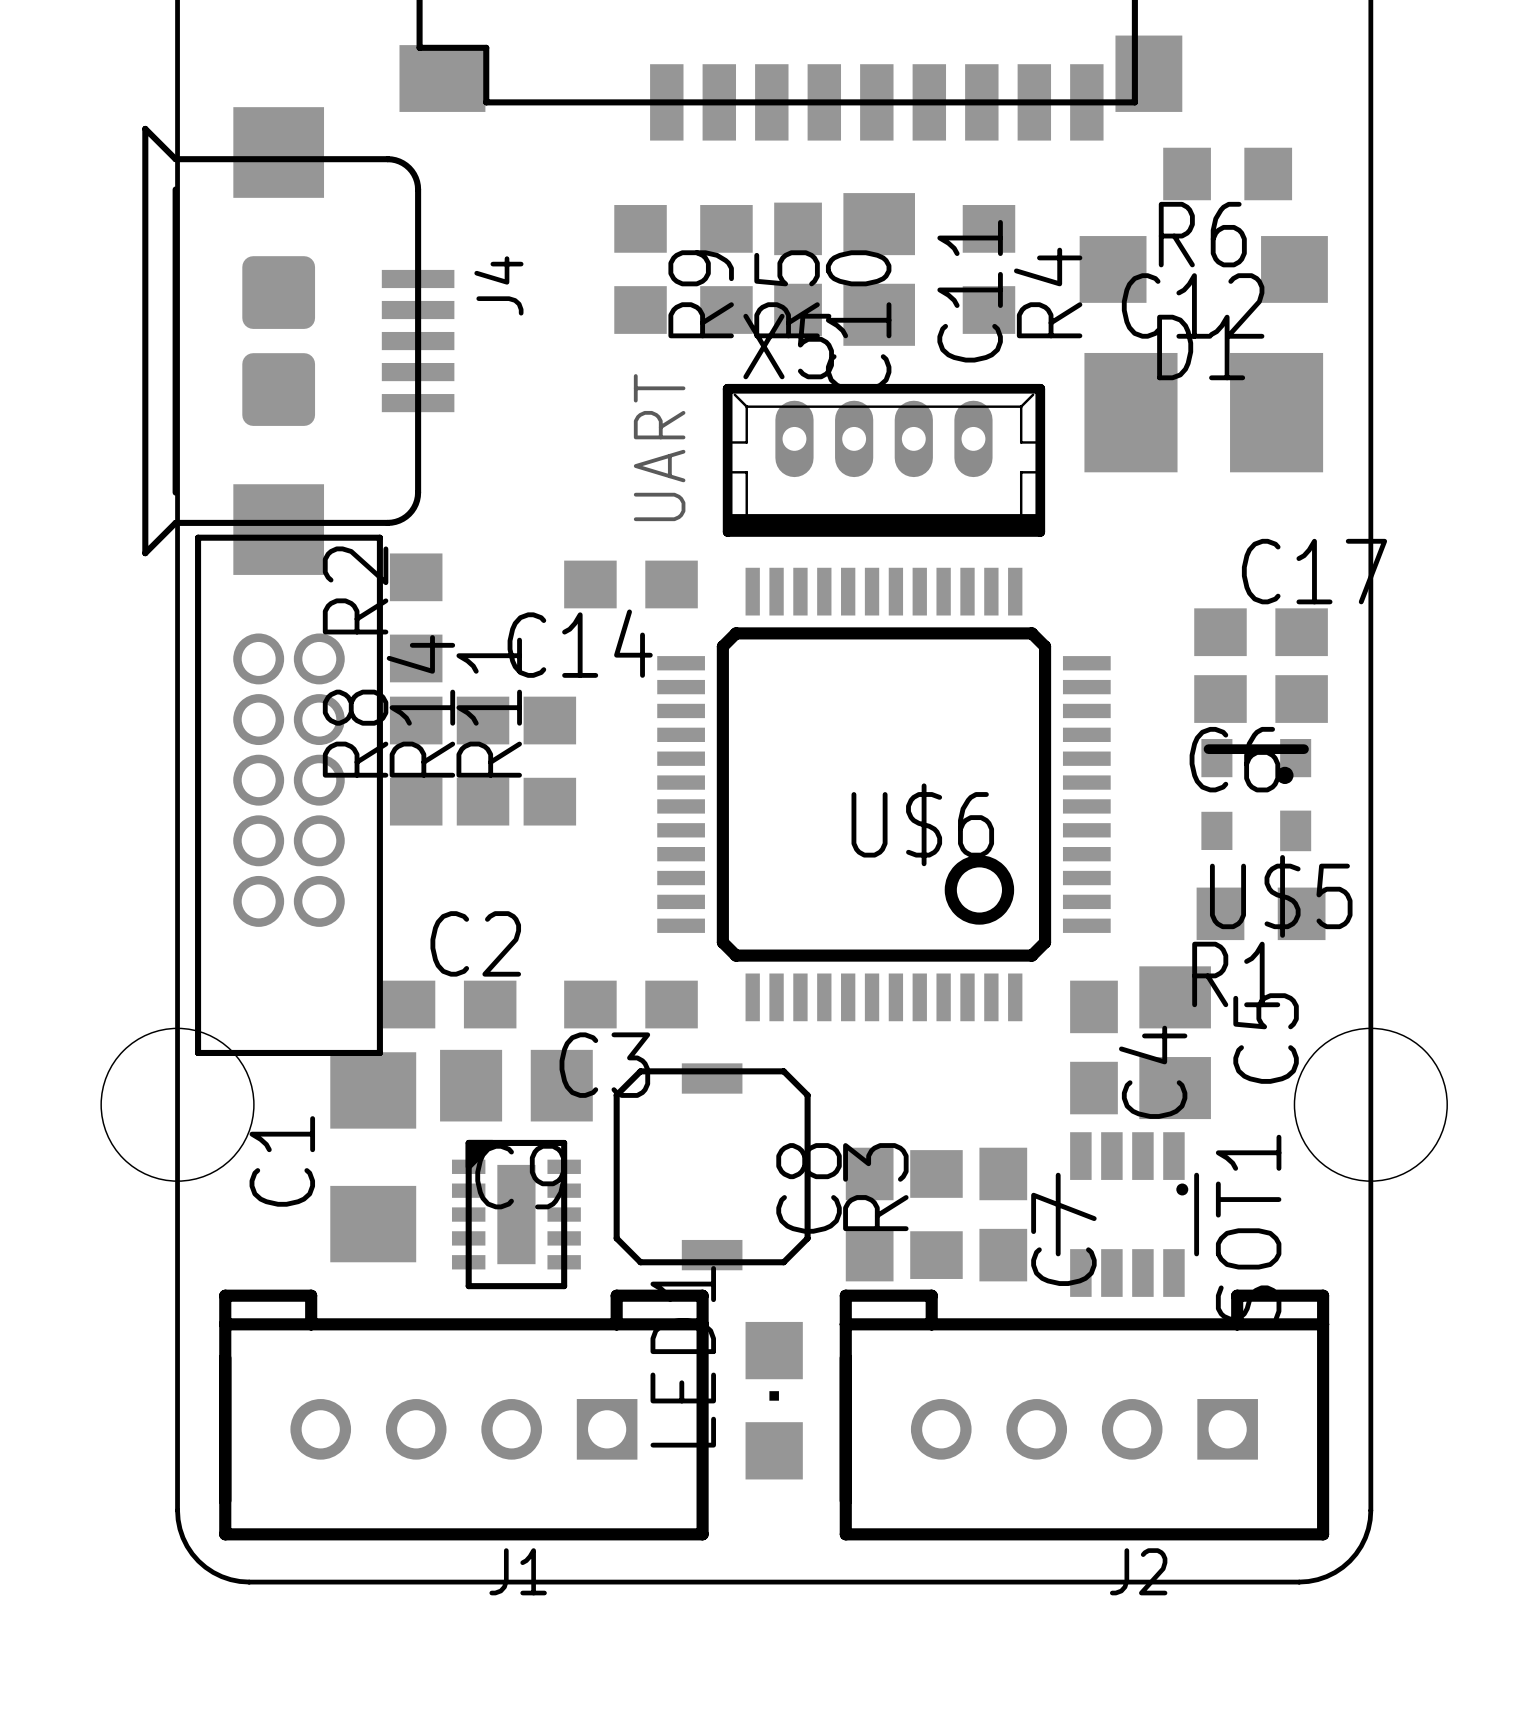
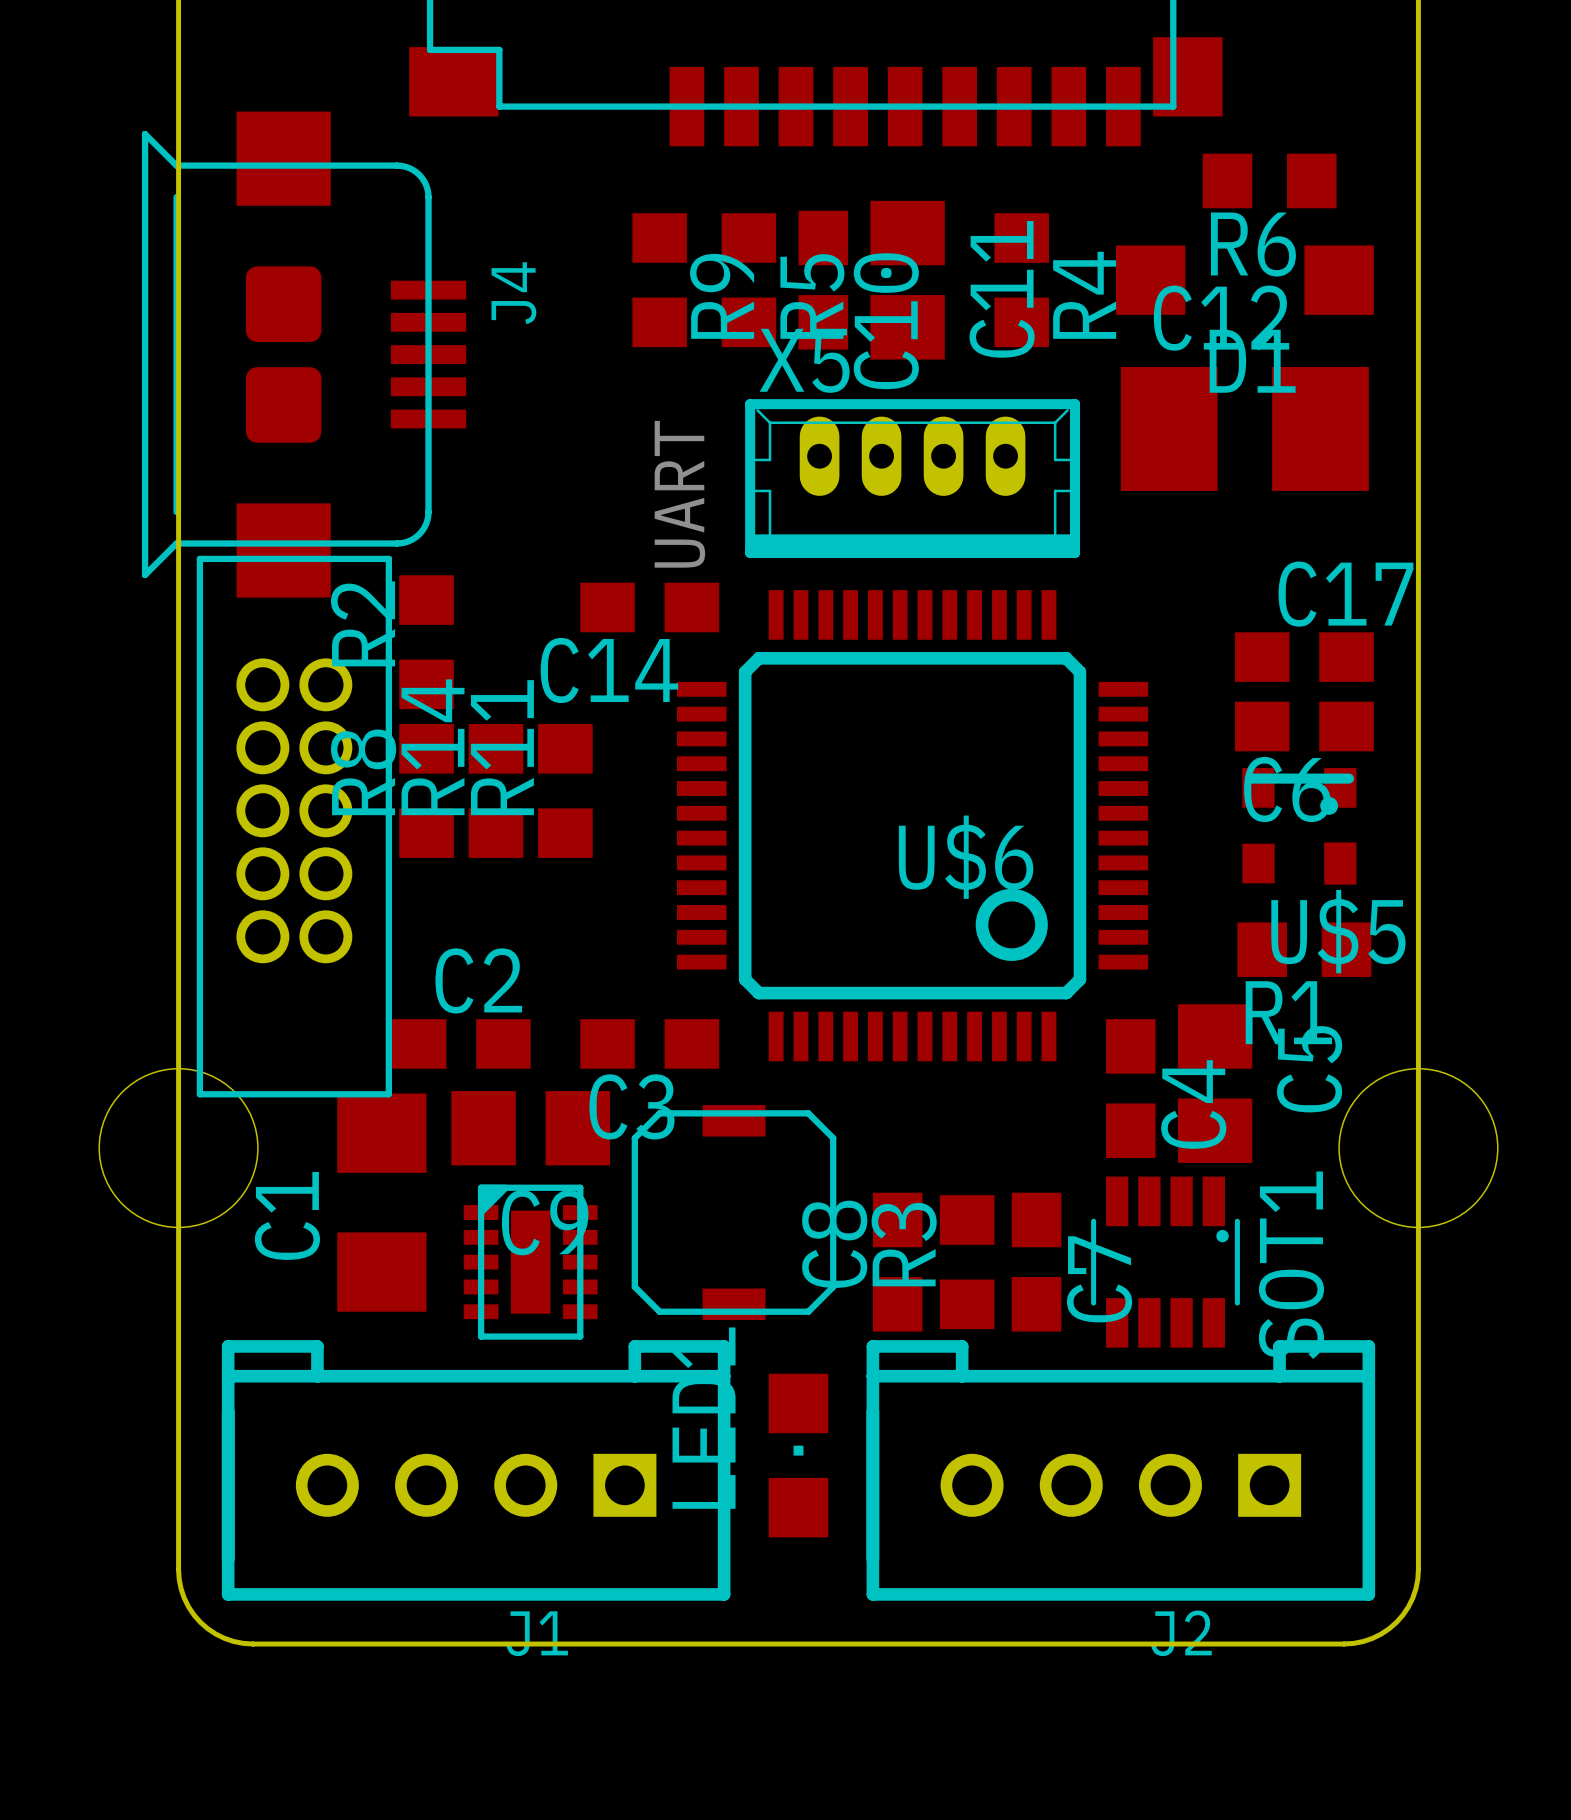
text position: UART (659, 447) -> UART (679, 494)

